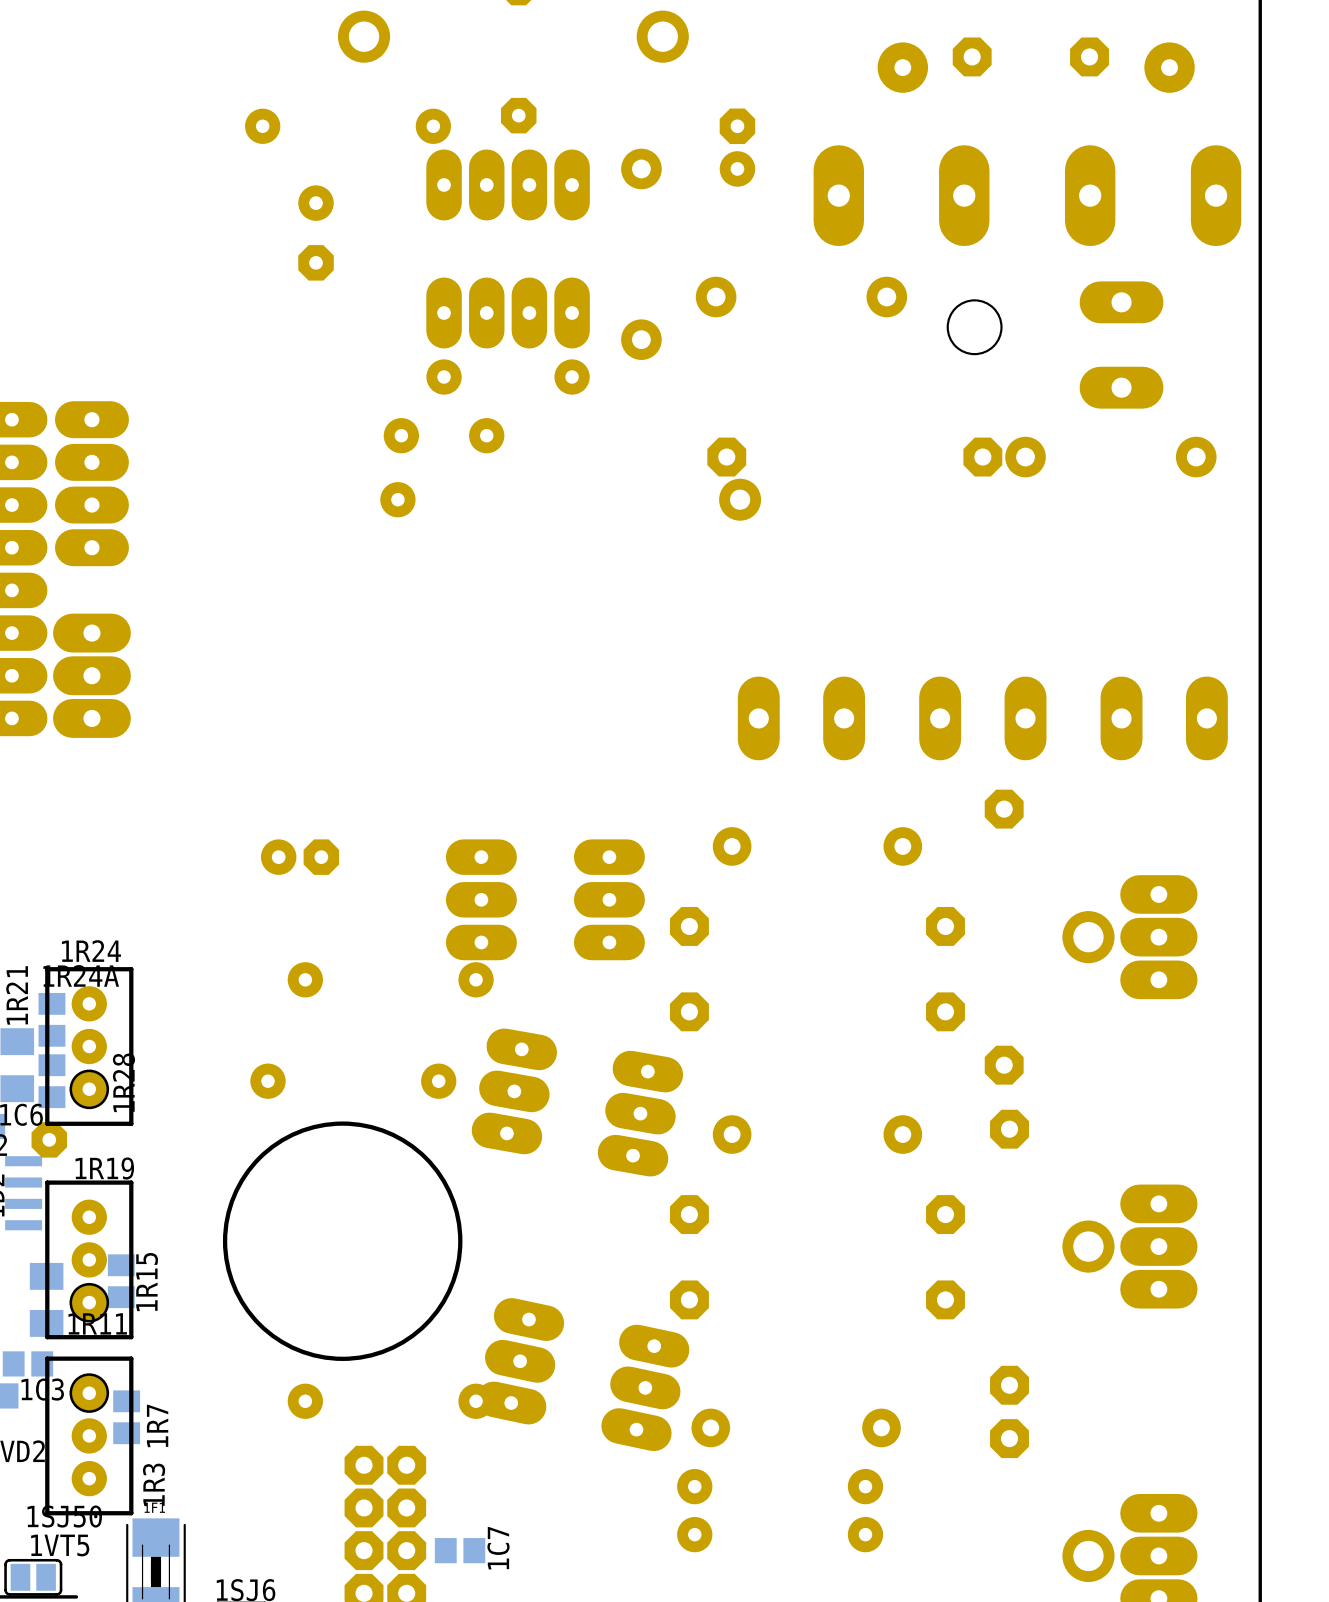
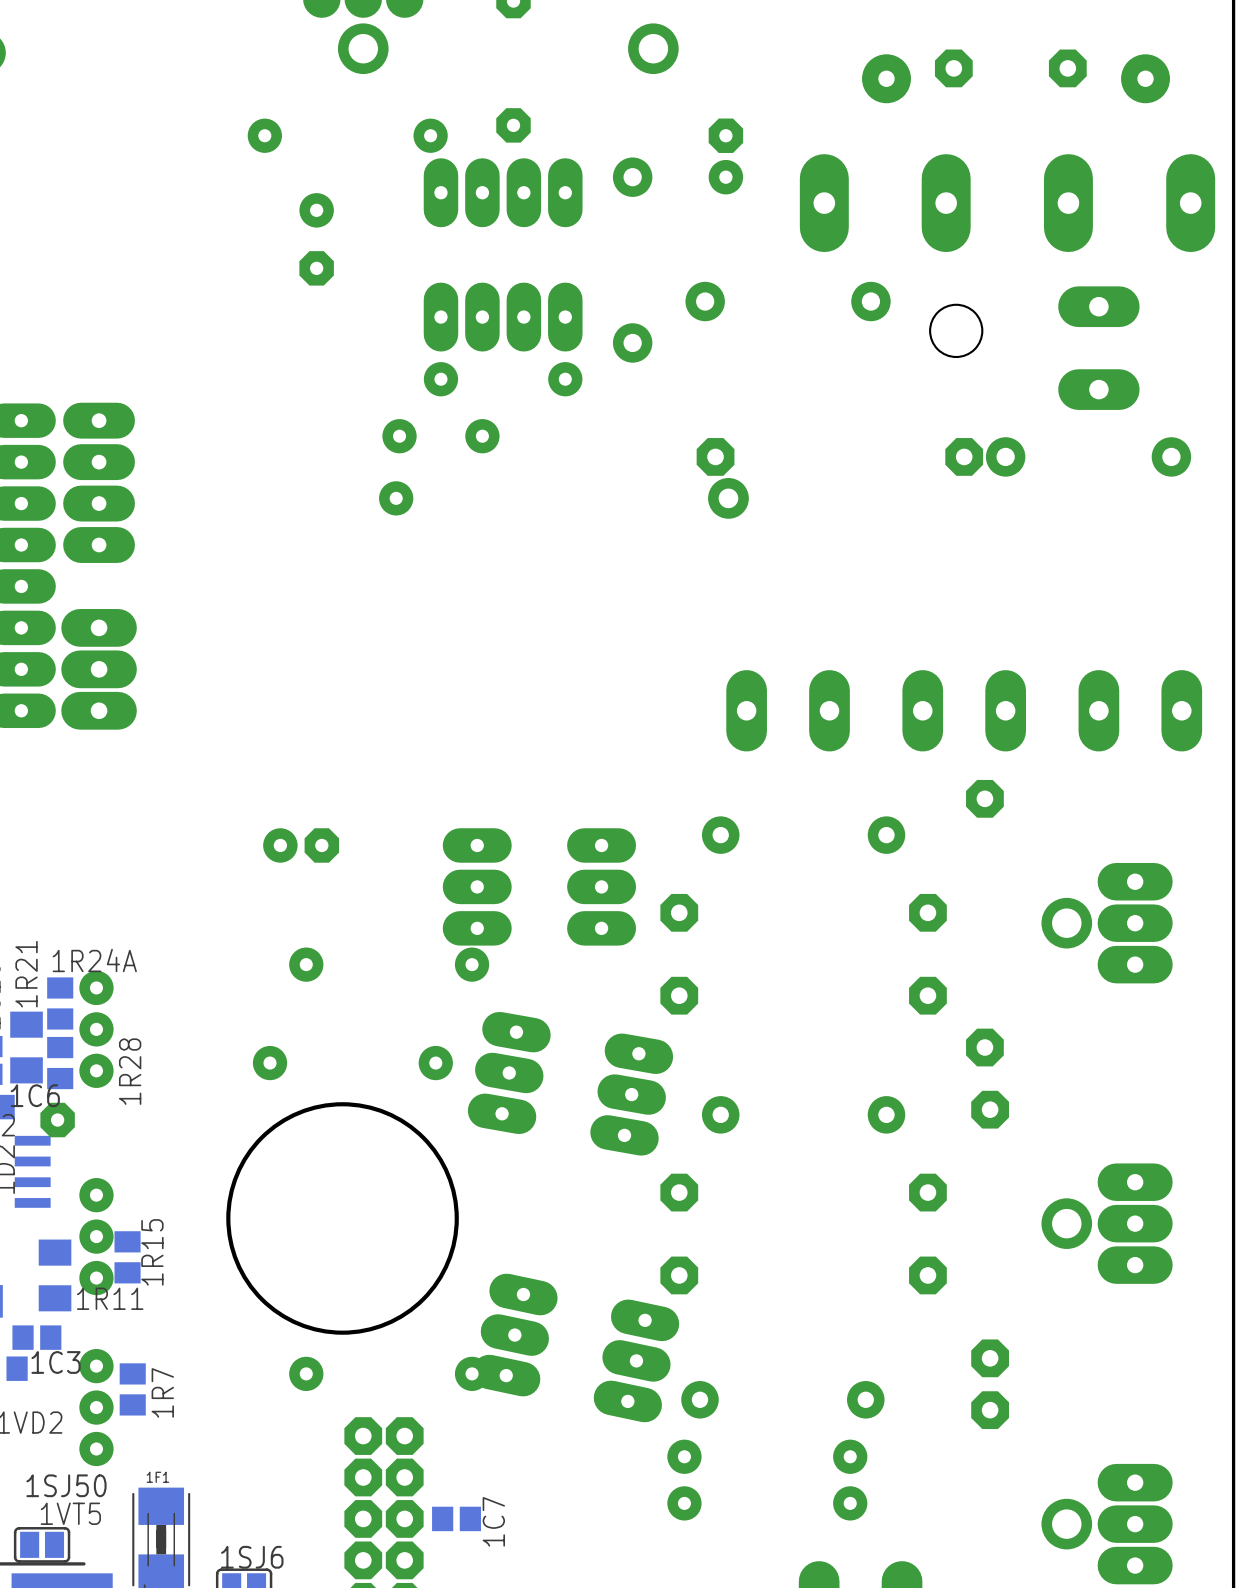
1R24 side: bottom (89, 1046) -> top (96, 1029)
1R19 side: bottom (89, 1259) -> top (96, 1236)
1R3 side: bottom (89, 1435) -> top (96, 1407)

